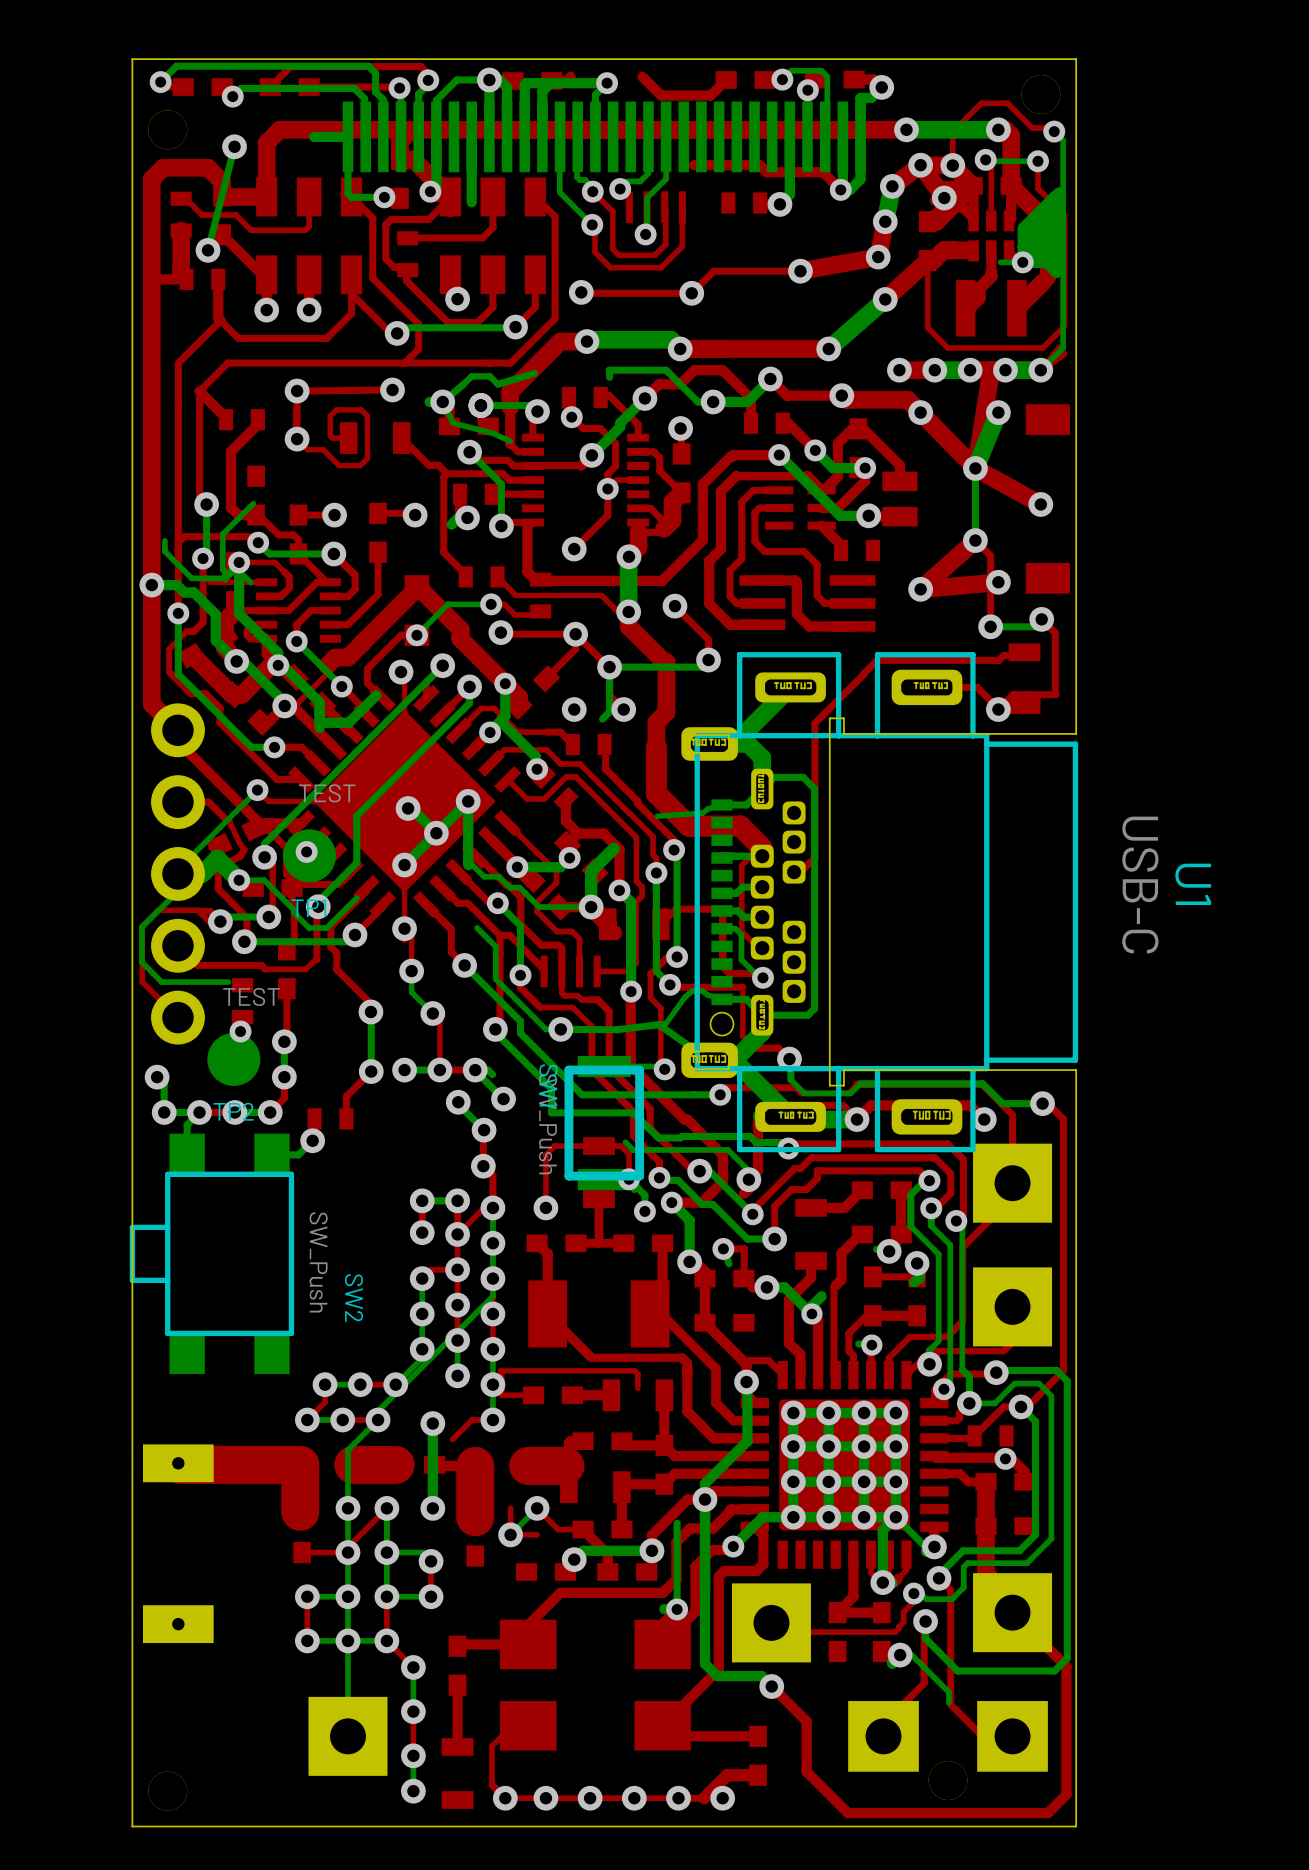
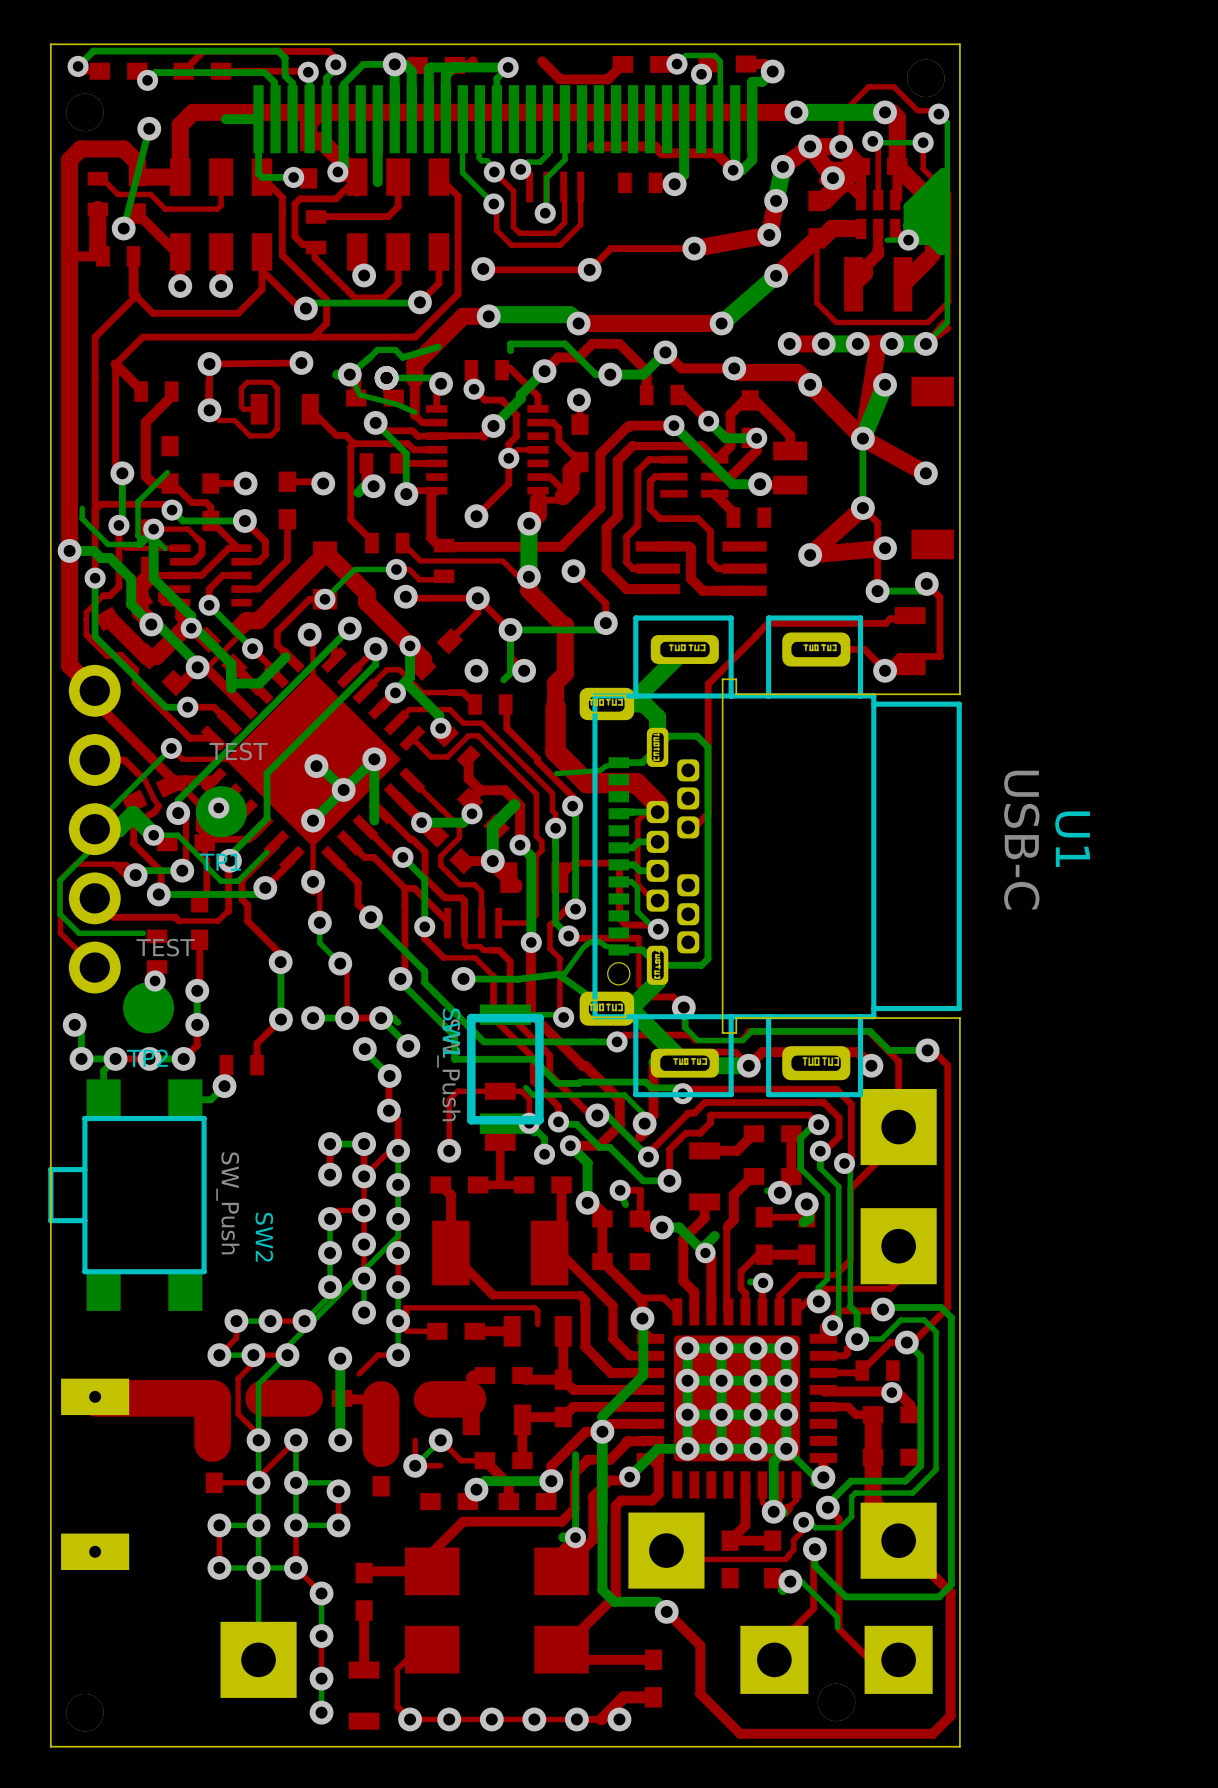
bottom track: (468, 860) (484, 876) (498, 876) (509, 887) (519, 887) (539, 907) (591, 907) -> none
bottom track: (477, 927) (495, 946) (495, 979) (545, 1029) (560, 1029) -> none
top track: none -> (253, 1363) (238, 1378) (238, 1414) (258, 1434)

